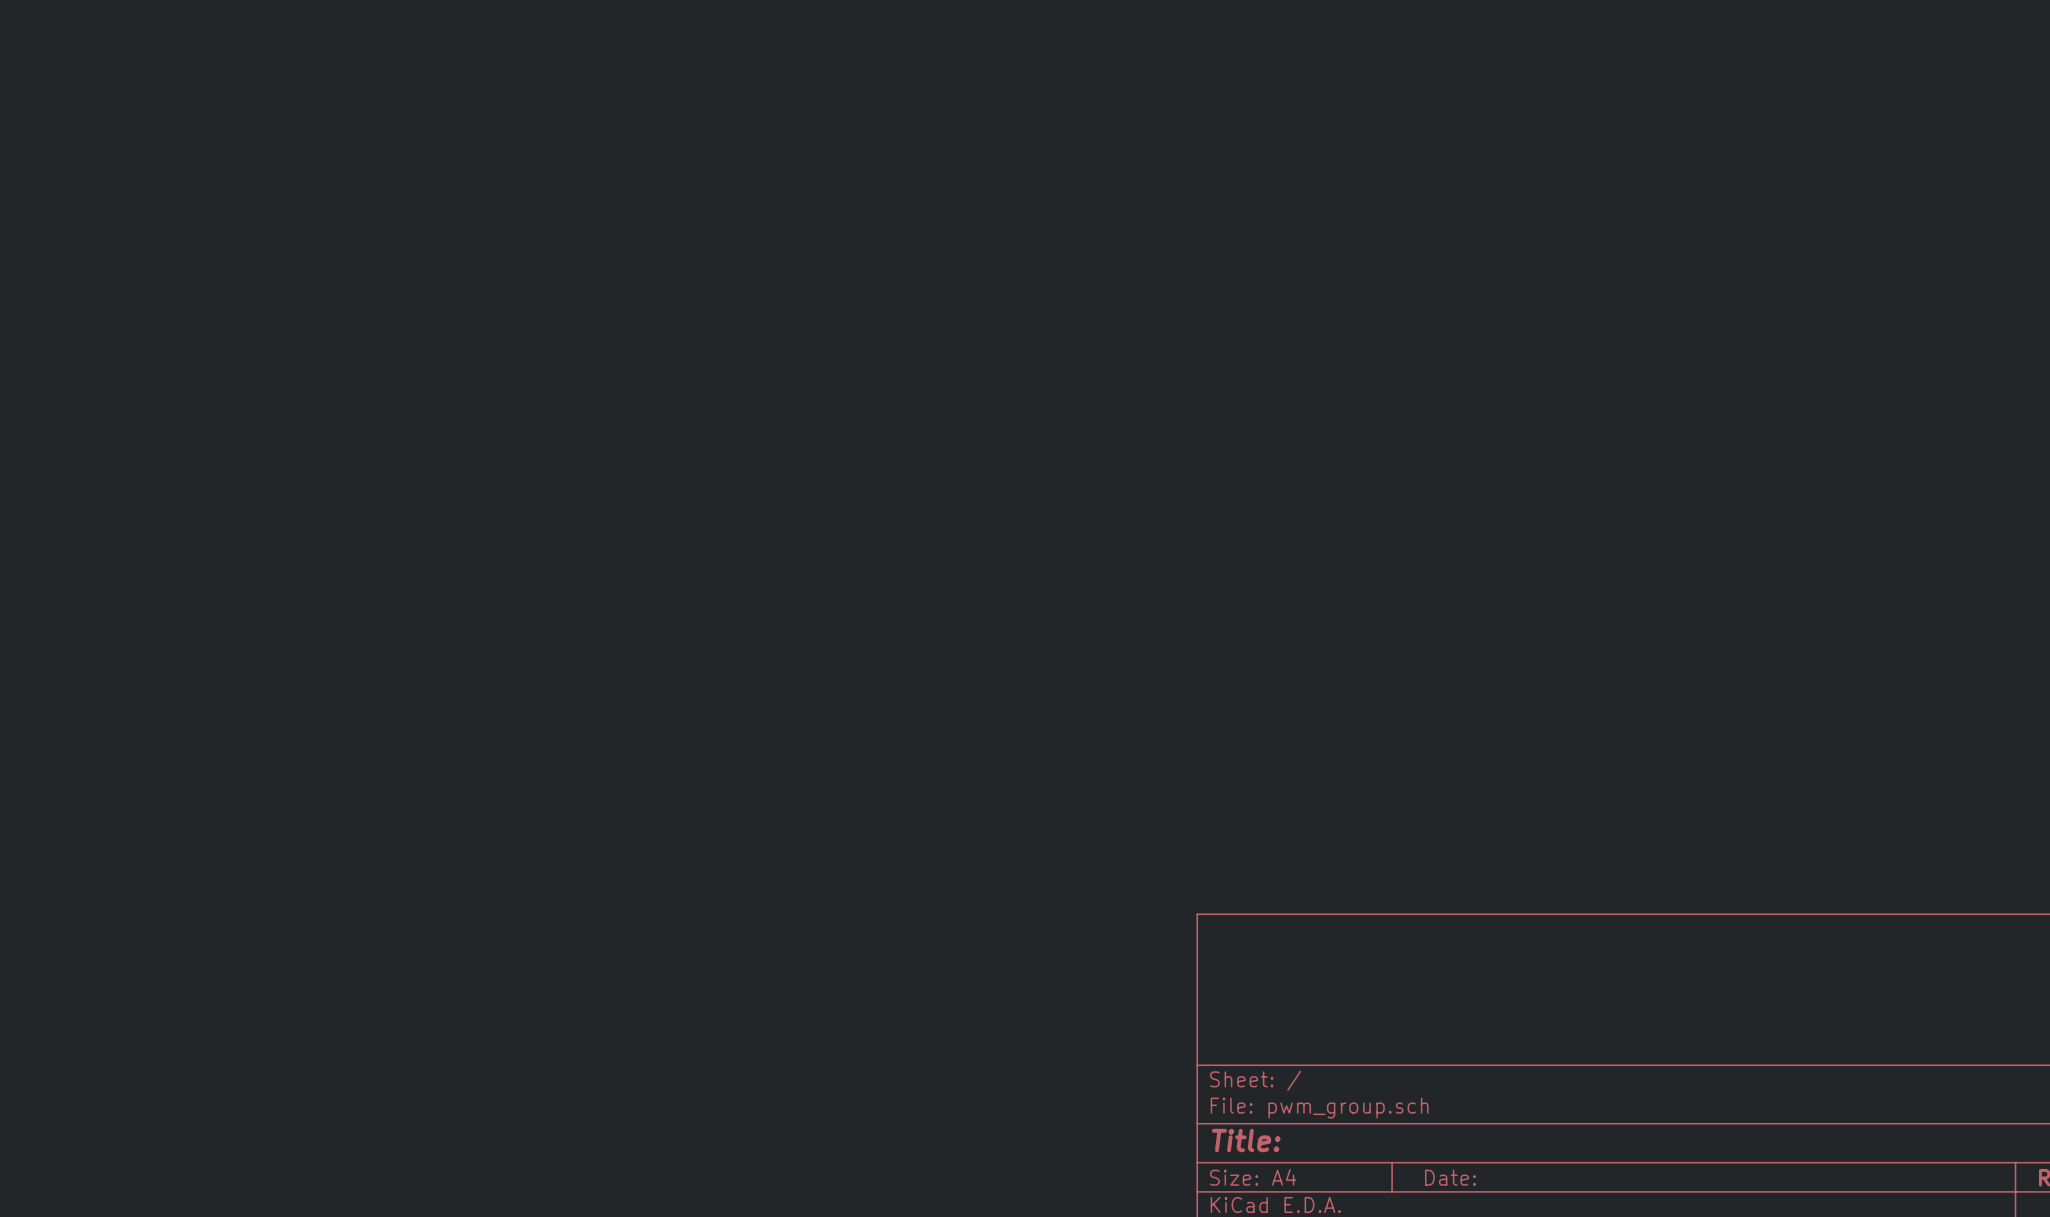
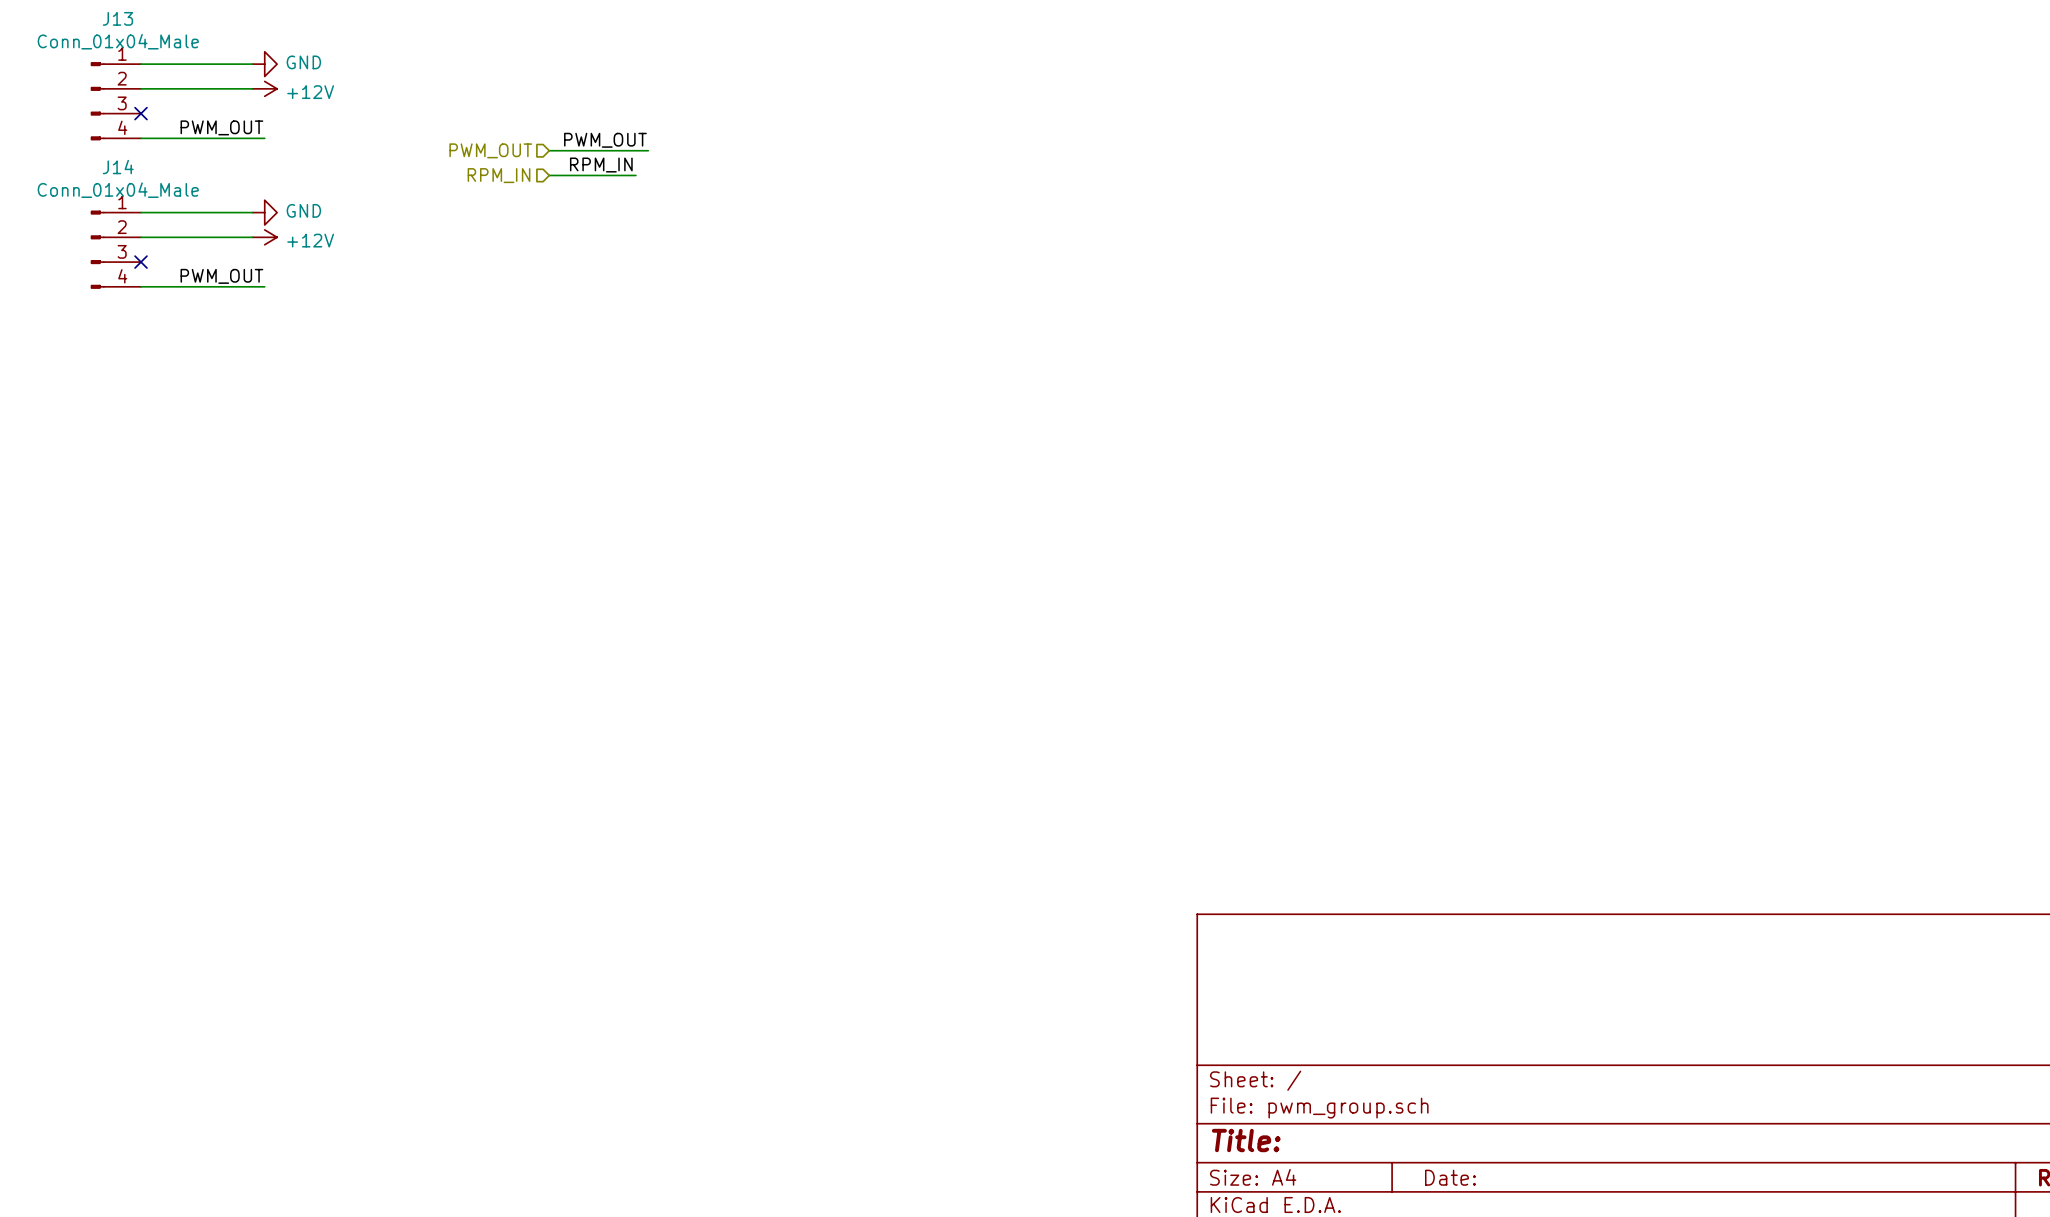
wire: none -> (141, 64) (252, 64)
power symbol: none -> GND (264, 64)
wire: none -> (141, 88) (252, 88)
power symbol: none -> +12V (264, 88)
J13: none -> Conn_01x04_Male (115, 101)
no-connect mark: none -> (141, 113)
label: none -> PWM_OUT (221, 127)
wire: none -> (141, 138) (264, 138)
label: none -> PWM_OUT (605, 140)
hierarchical label: none -> PWM_OUT (490, 150)
wire: none -> (549, 150) (648, 150)
label: none -> RPM_IN (601, 165)
hierarchical label: none -> RPM_IN (499, 175)
wire: none -> (549, 175) (635, 175)
wire: none -> (141, 212) (252, 212)
power symbol: none -> GND (264, 212)
wire: none -> (141, 237) (252, 237)
power symbol: none -> +12V (264, 237)
J14: none -> Conn_01x04_Male (115, 249)
no-connect mark: none -> (141, 262)
label: none -> PWM_OUT (221, 276)
wire: none -> (141, 286) (264, 286)

